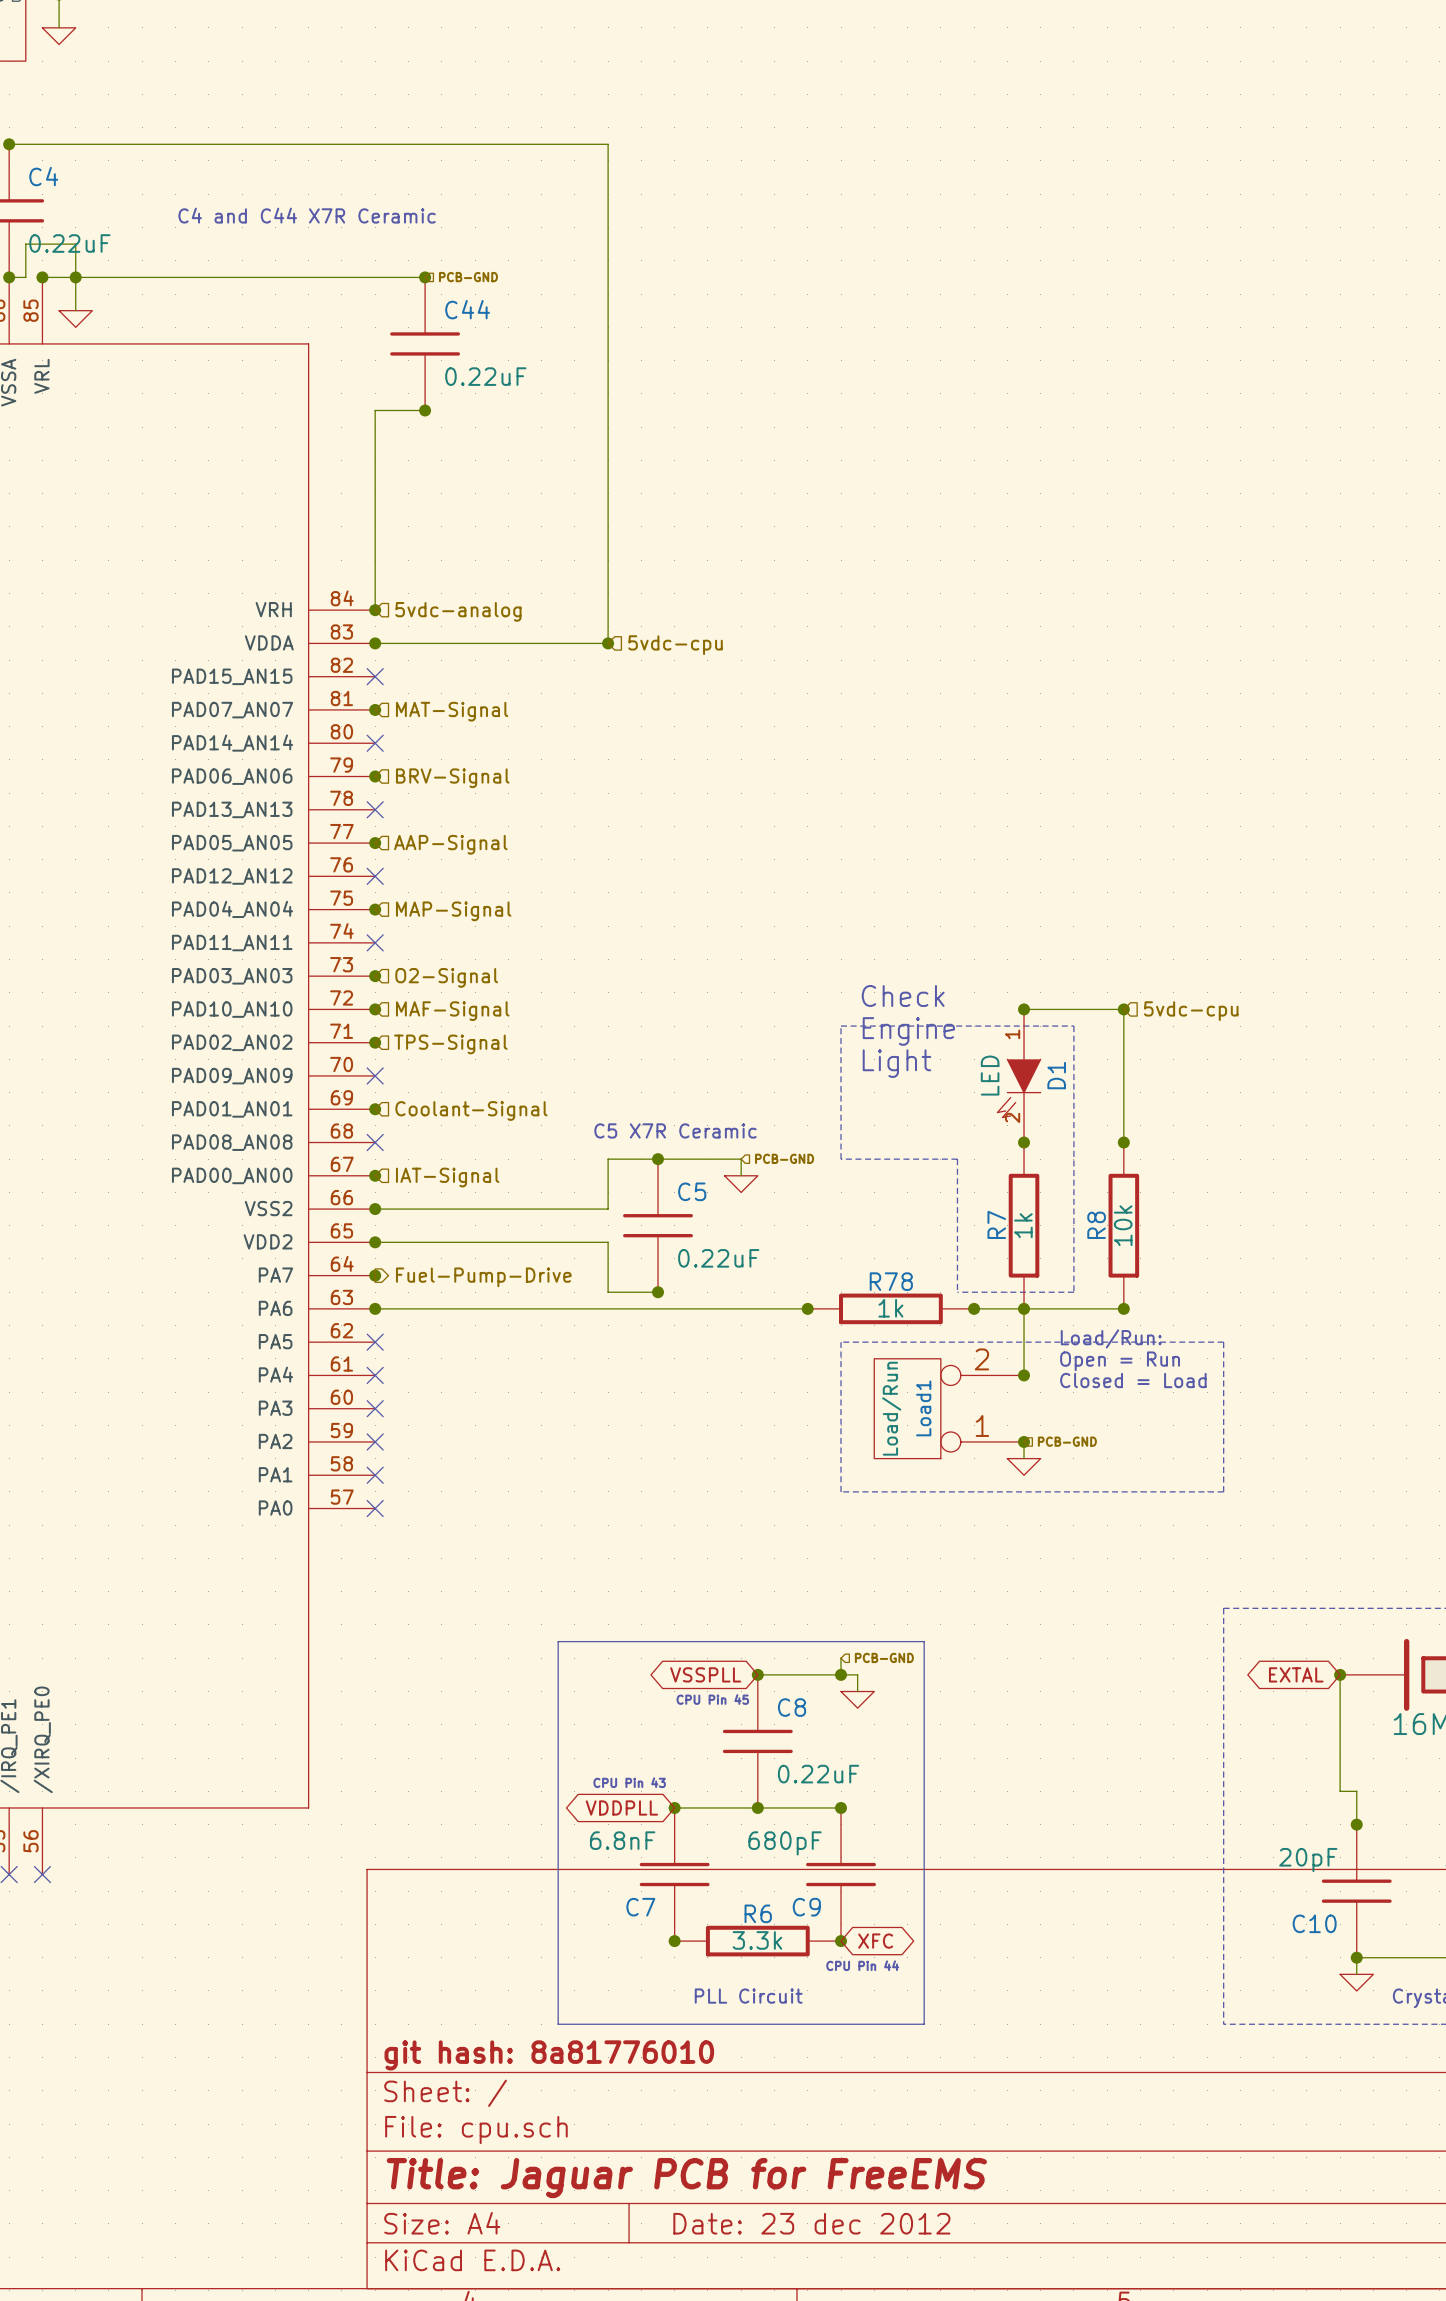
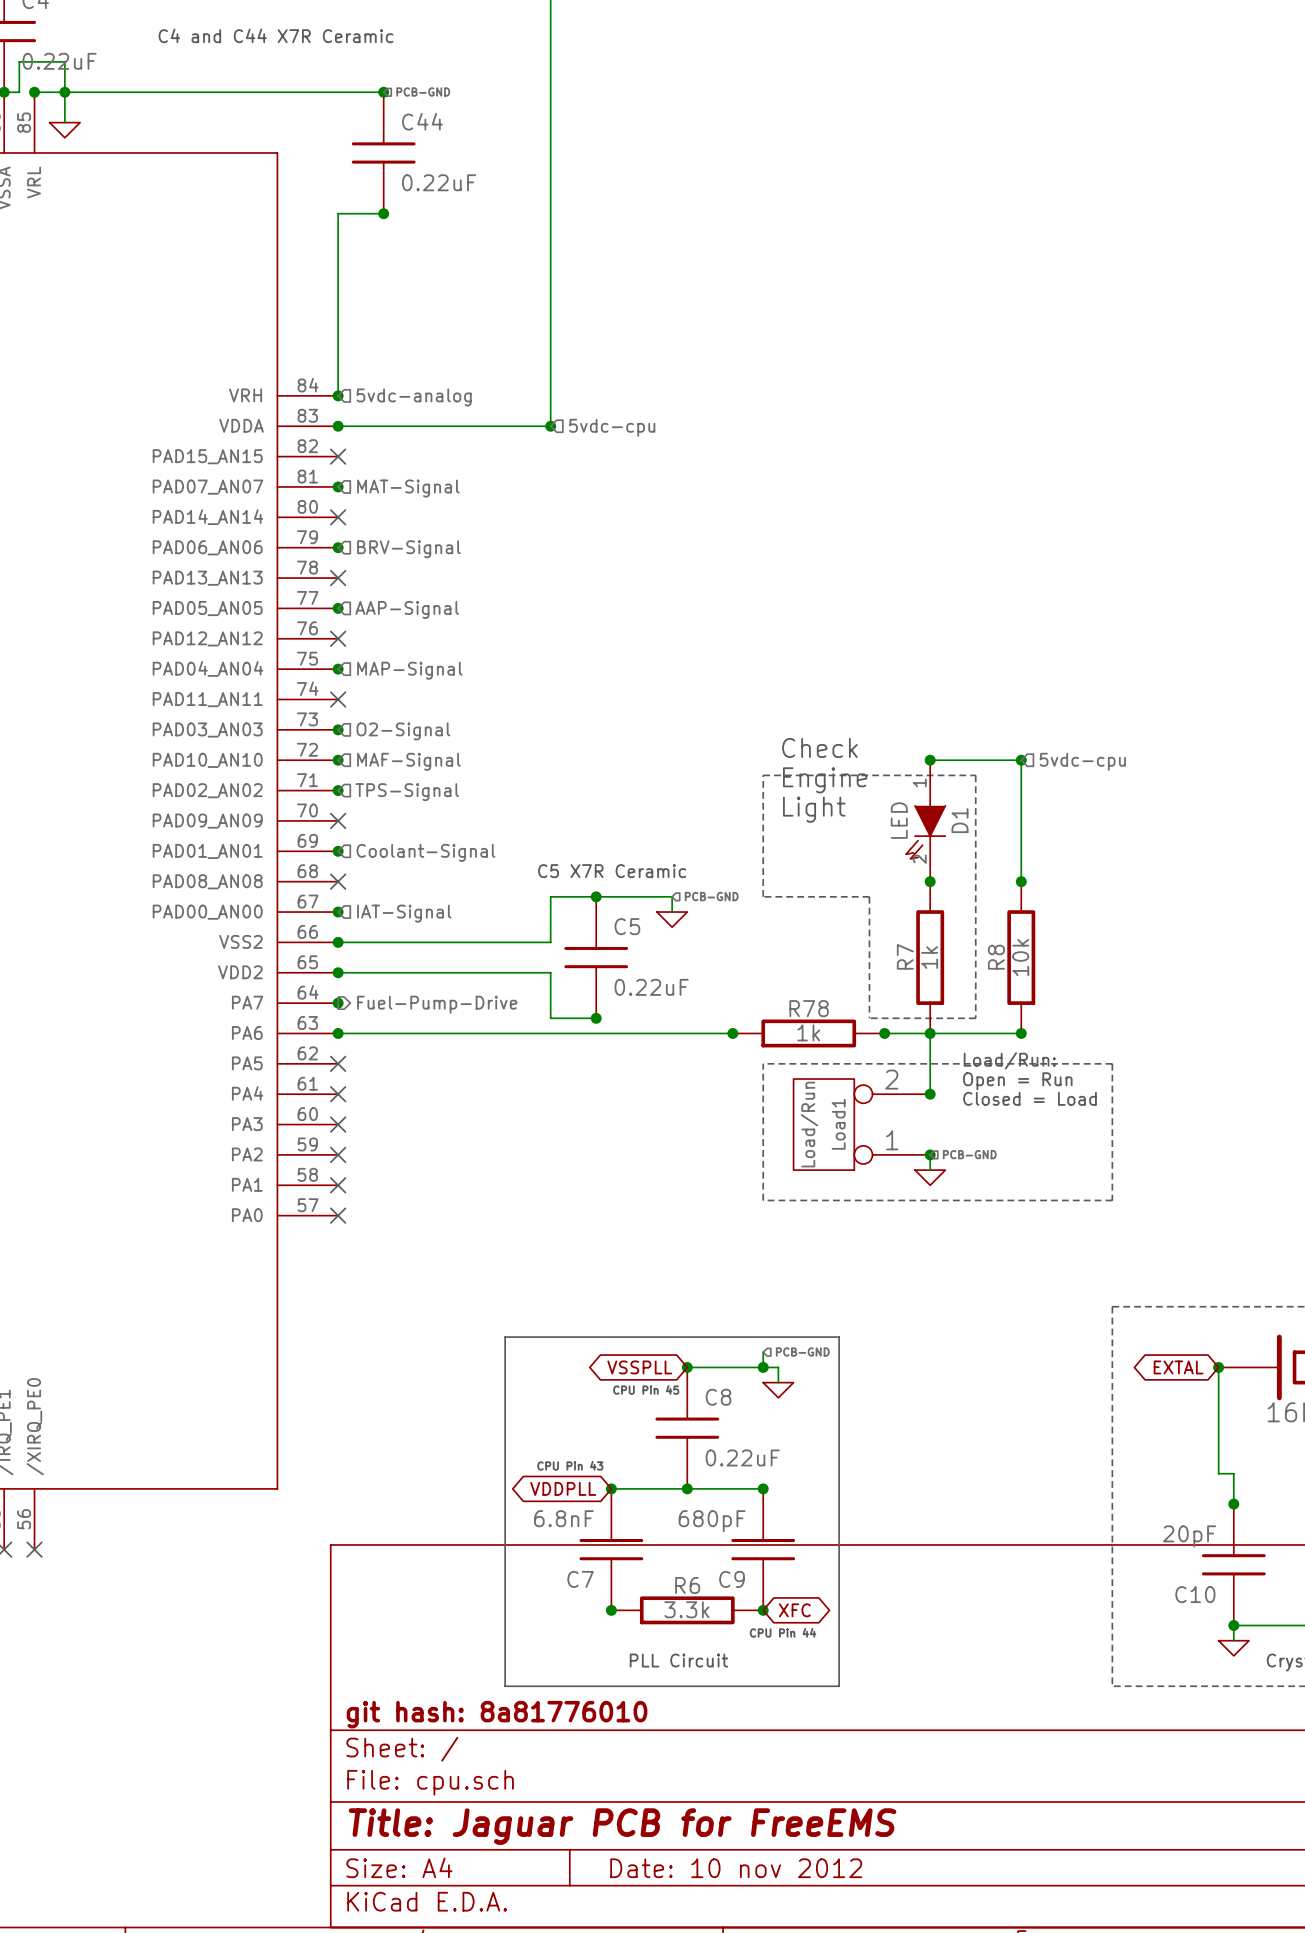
title block: Date: 23 dec 2012 (811, 2223) -> Date: 10 nov 2012 (736, 1868)

